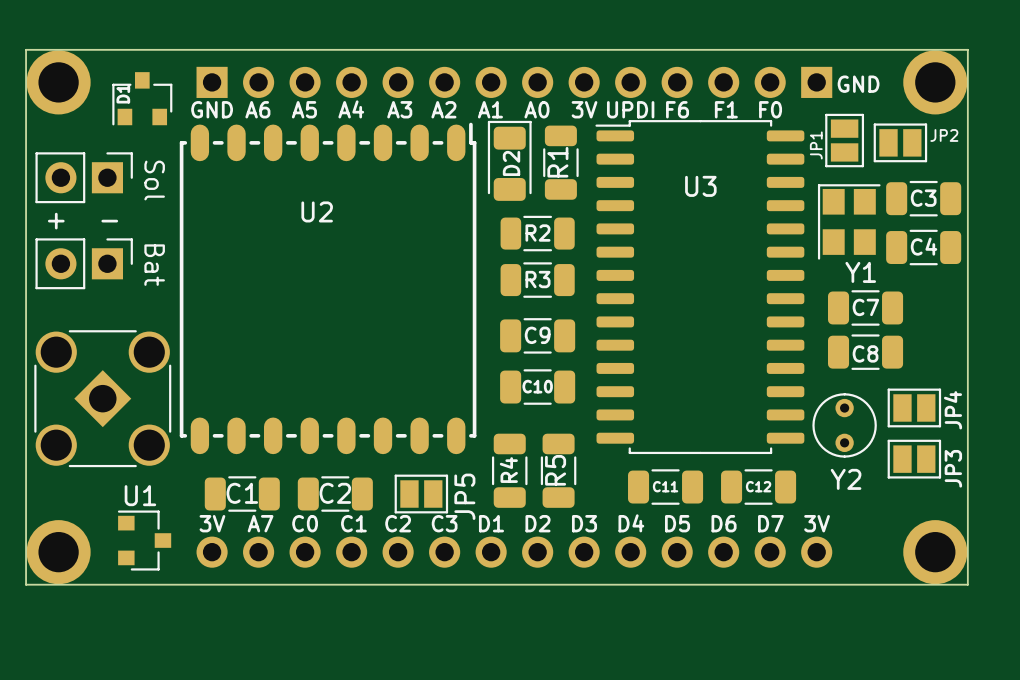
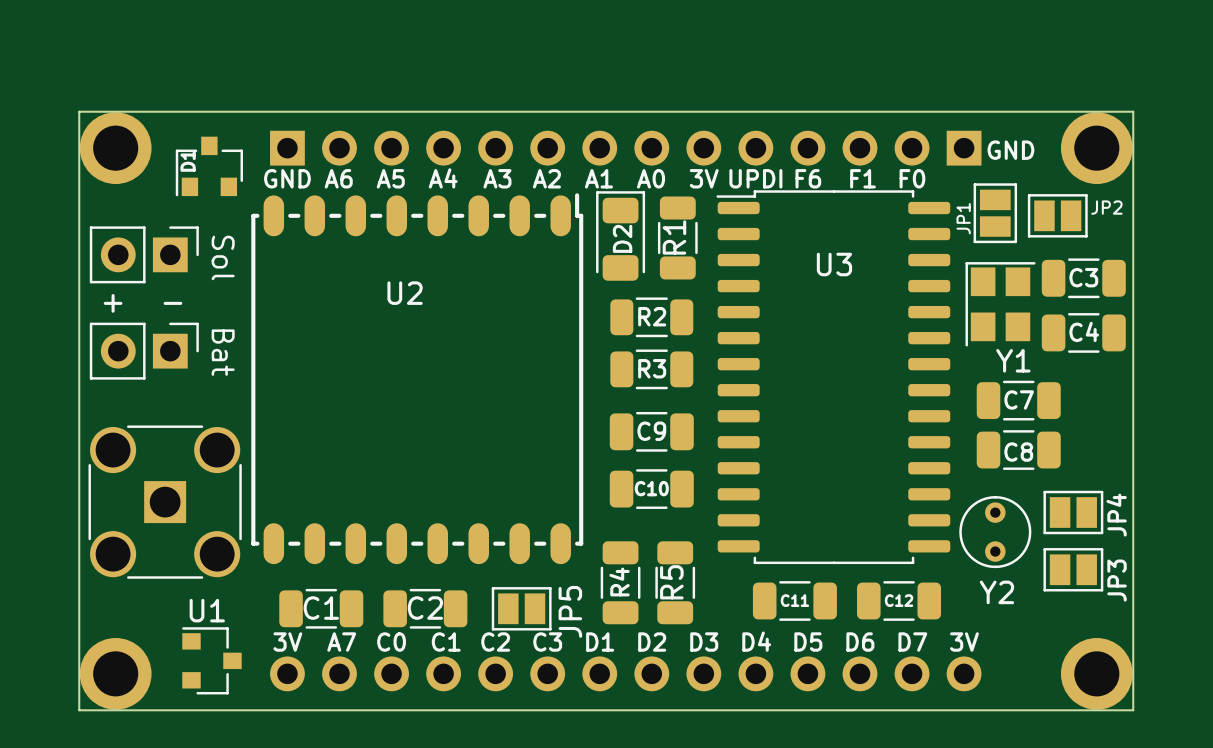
part footprint: [34, 330, 172, 468] -> [88, 425, 242, 579]

